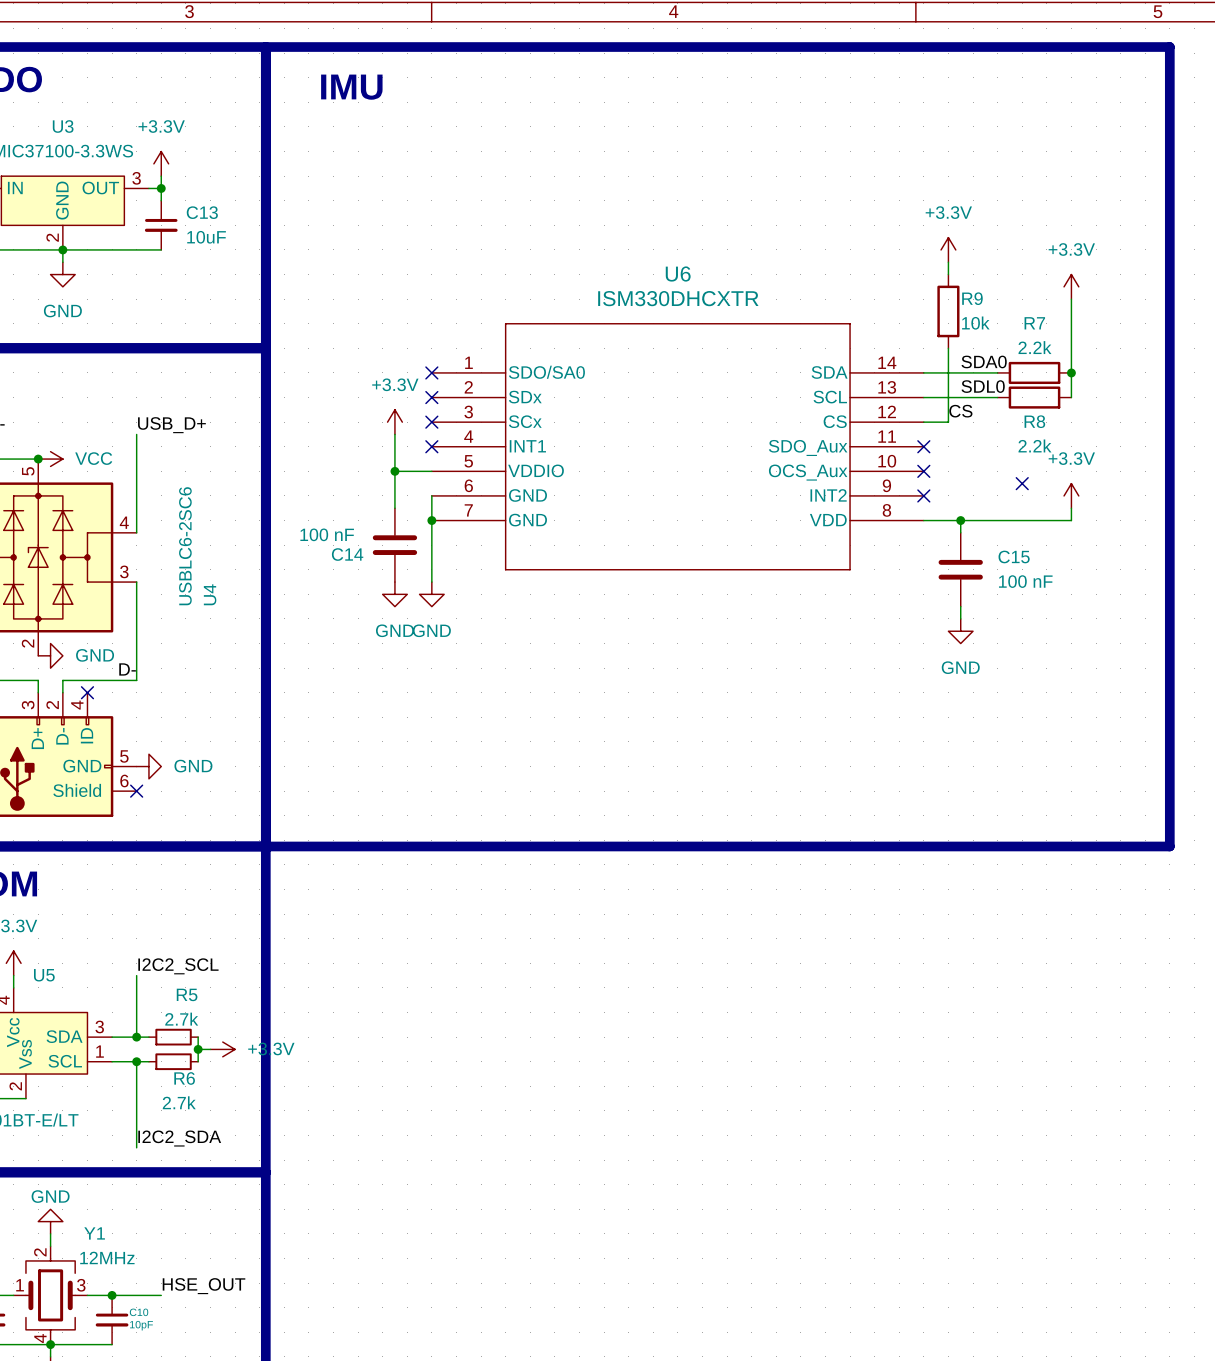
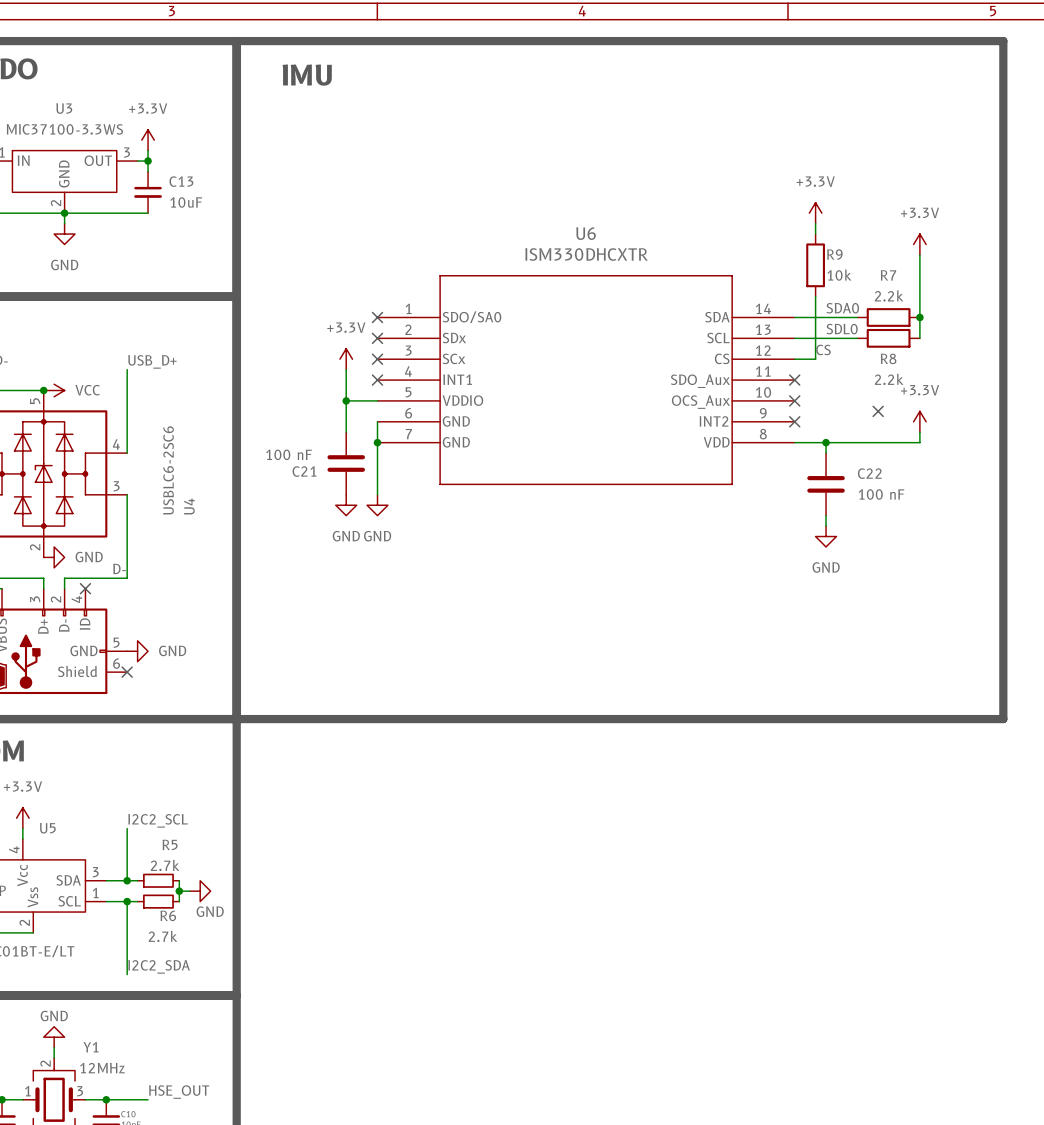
C14 name: C14 (347, 554) -> C21 (304, 471)
C15 name: C15 (1014, 556) -> C22 (869, 473)
power symbol: +3.3V (222, 1049) -> GND (200, 891)

